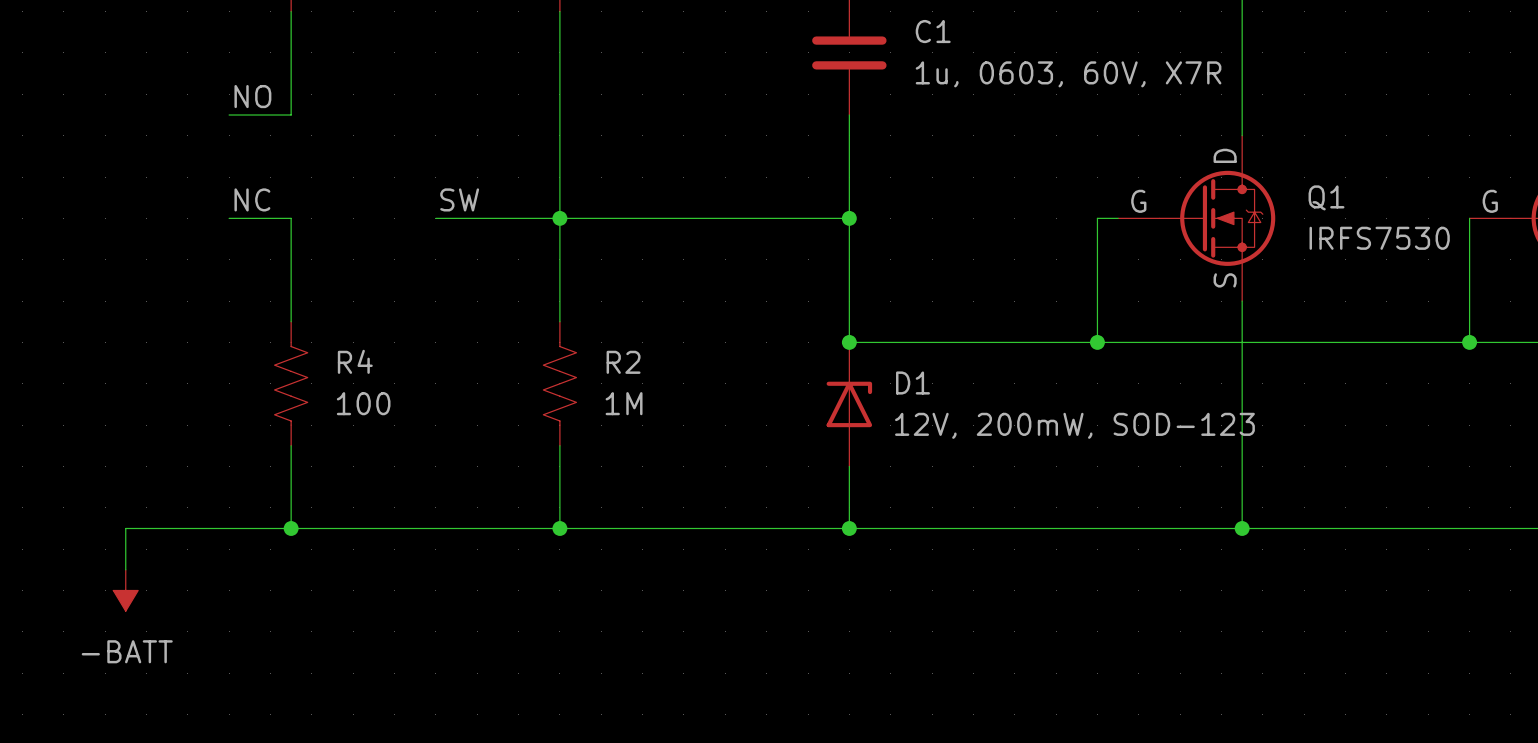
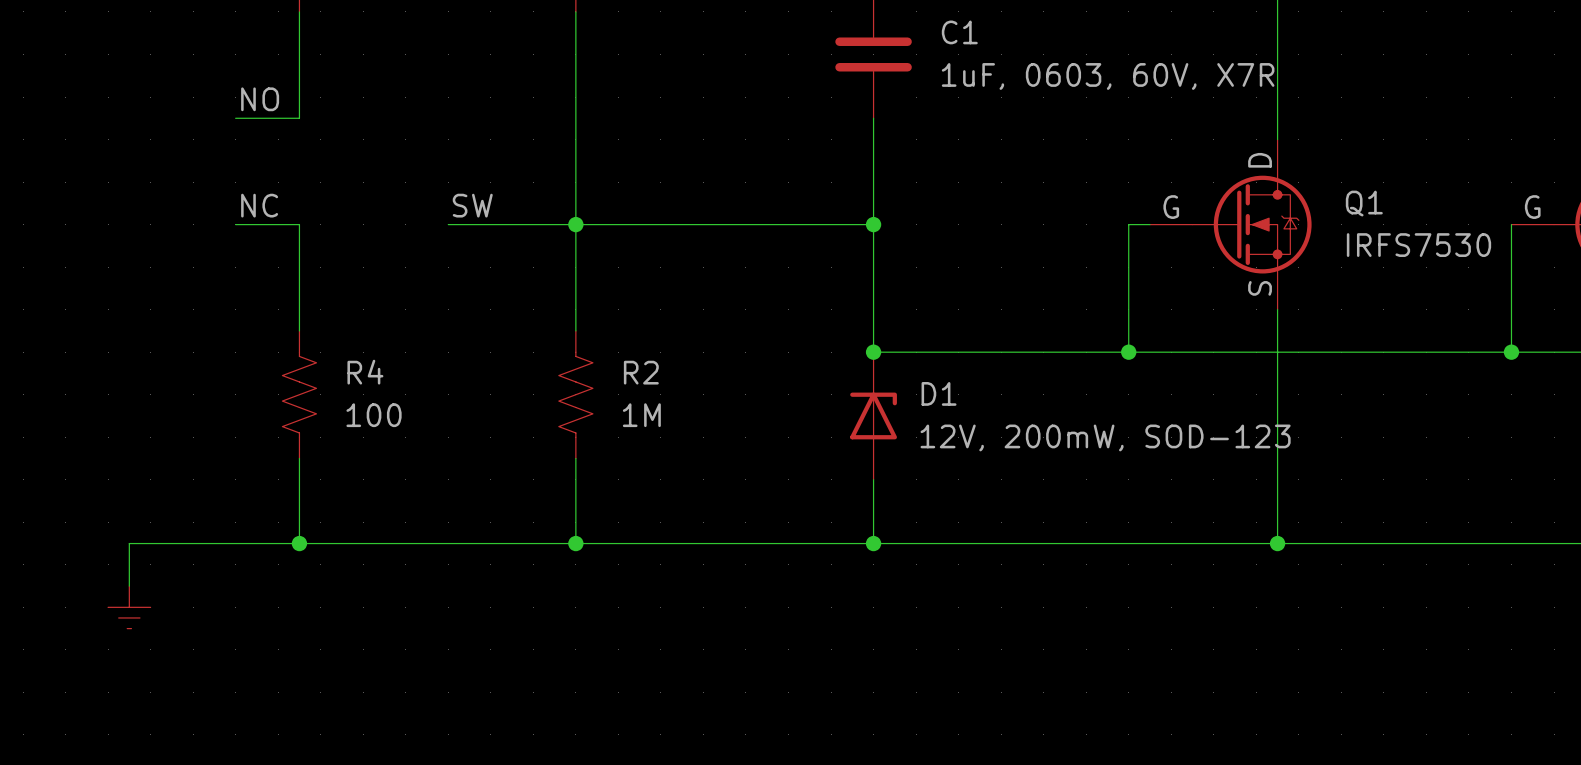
C1 value: 1u, 0603, 60V, X7R (1068, 74) -> 1uF, 0603, 60V, X7R (1108, 76)
power symbol shape: [113, 569, 139, 612] -> [108, 586, 151, 629]
power symbol text: -BATT (127, 651) -> none

